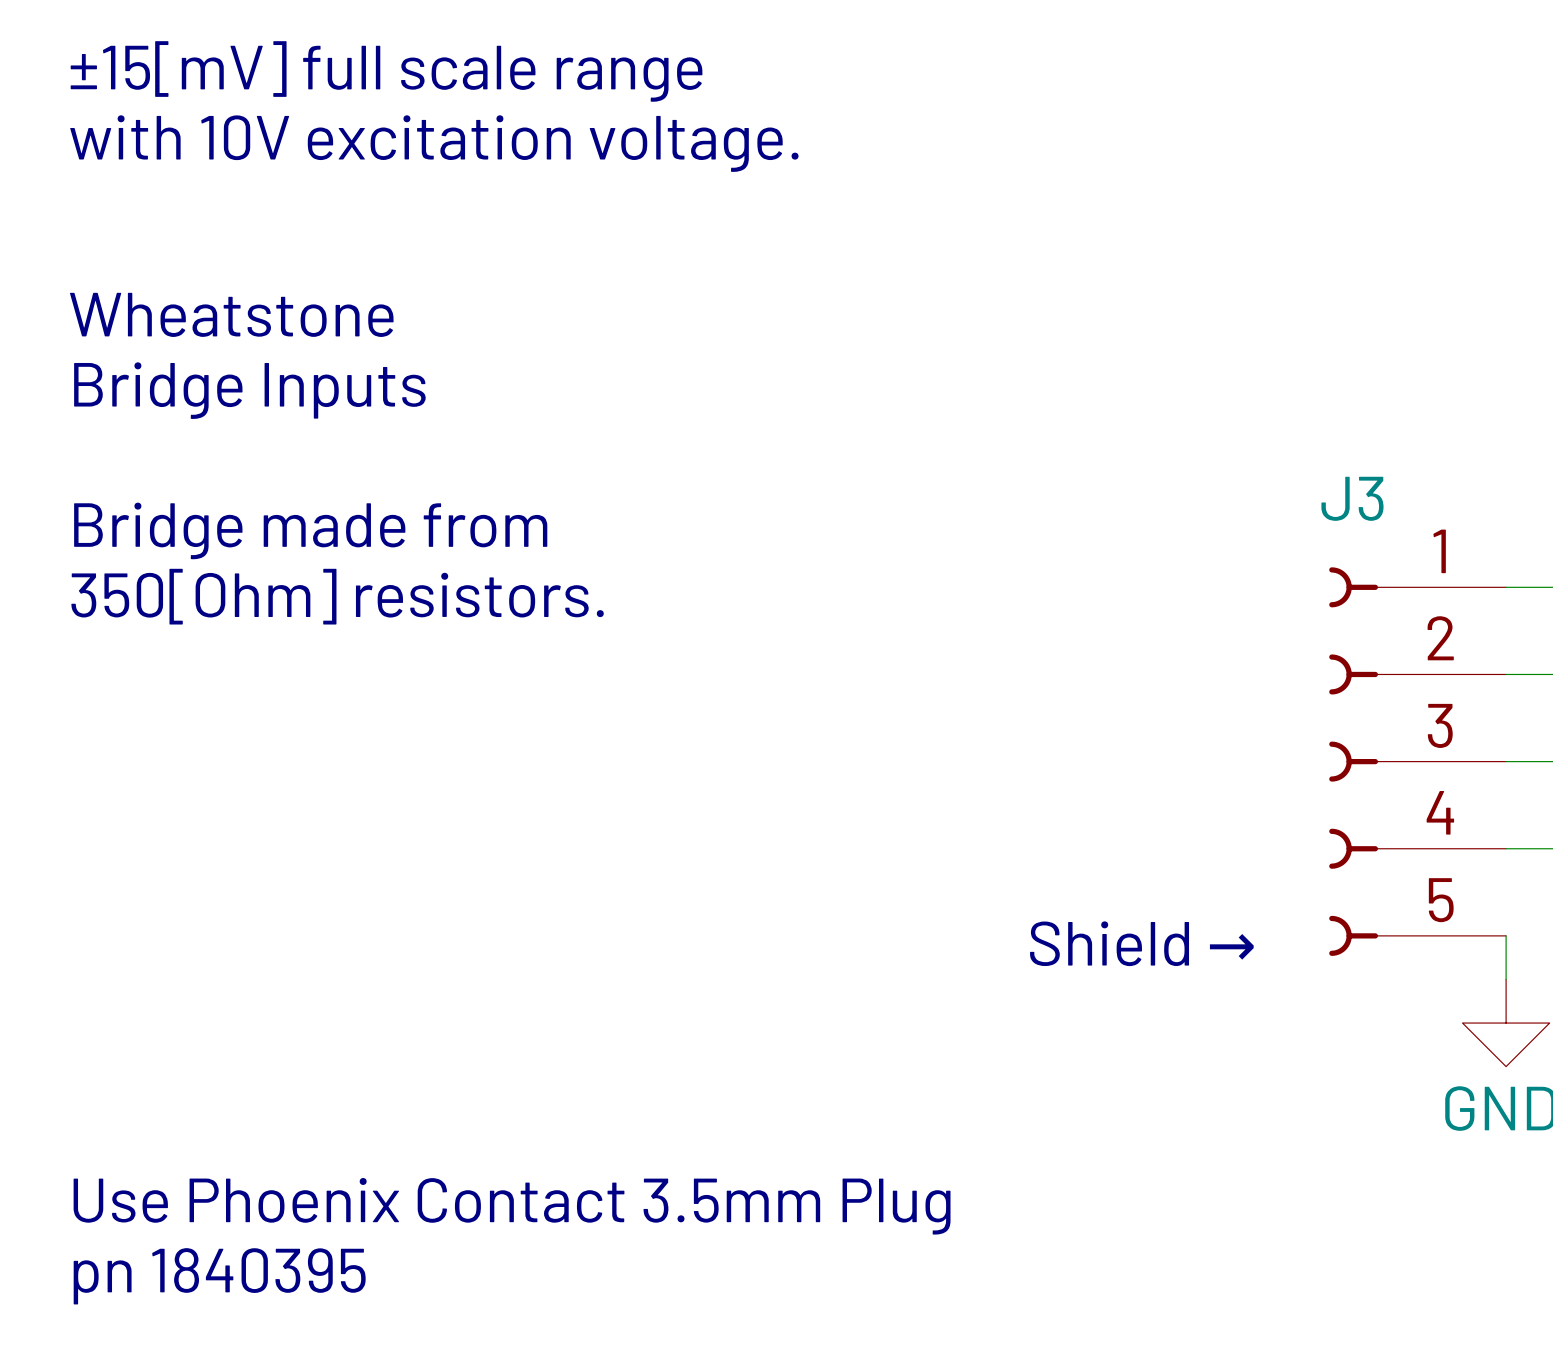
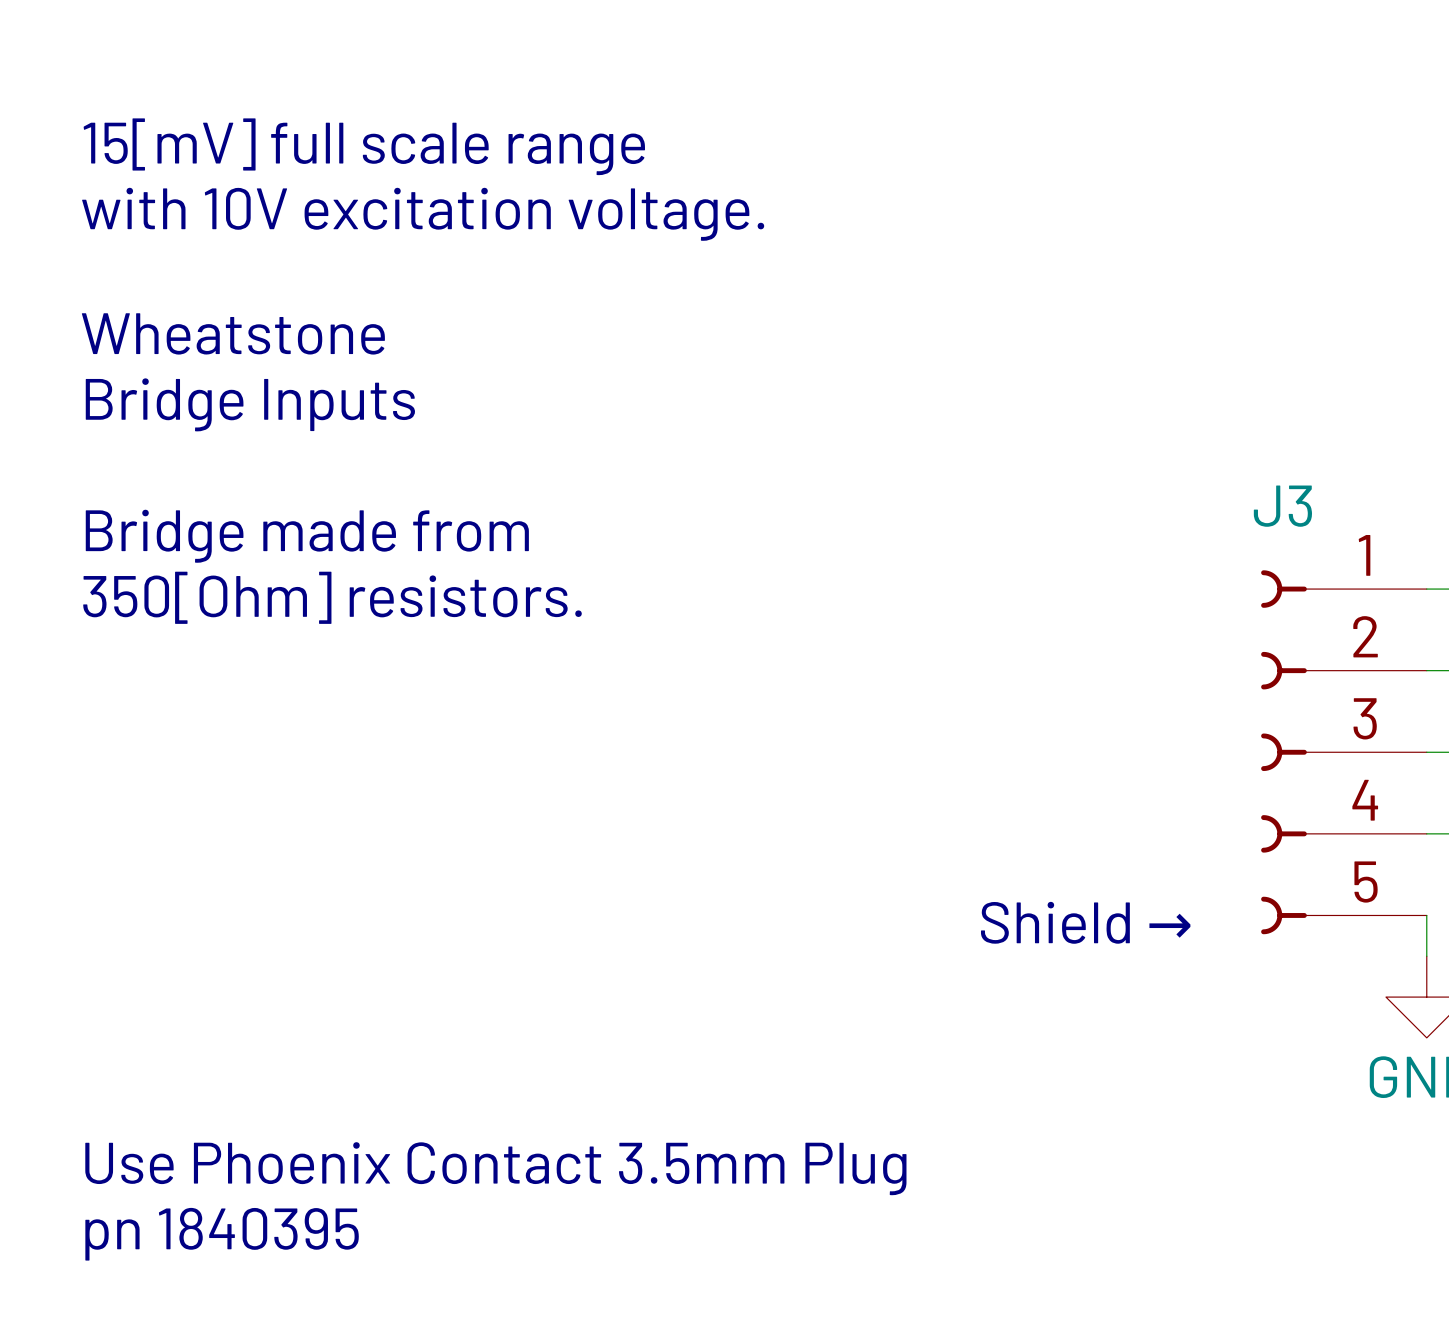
text: ±15[mV] full scale range (386, 71) -> 15[mV] full scale range (364, 146)
text position: with 10V excitation voltage. (434, 143) -> with 10V excitation voltage. (423, 214)

